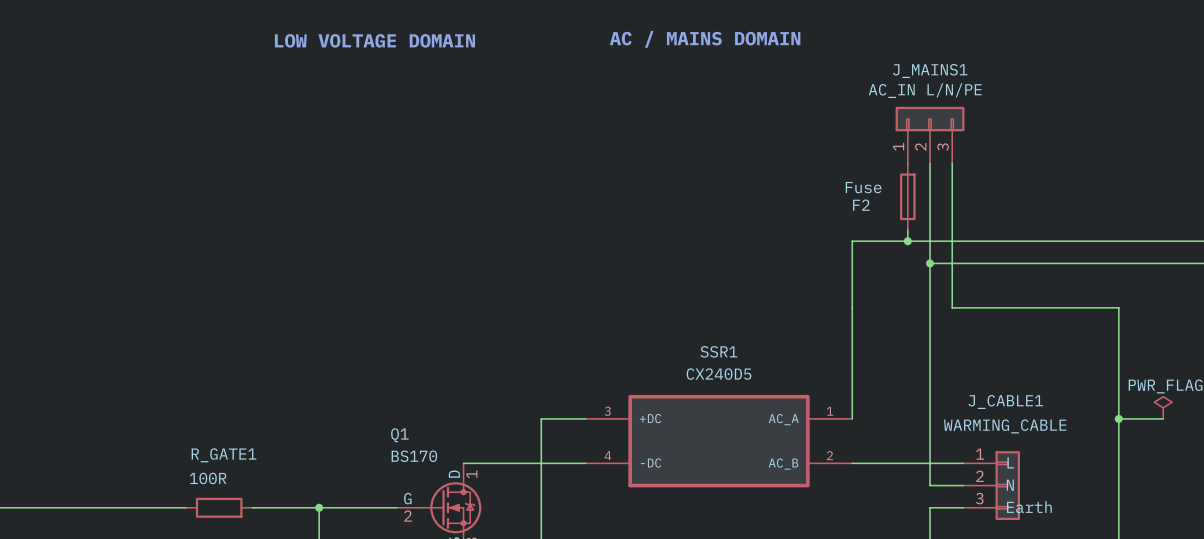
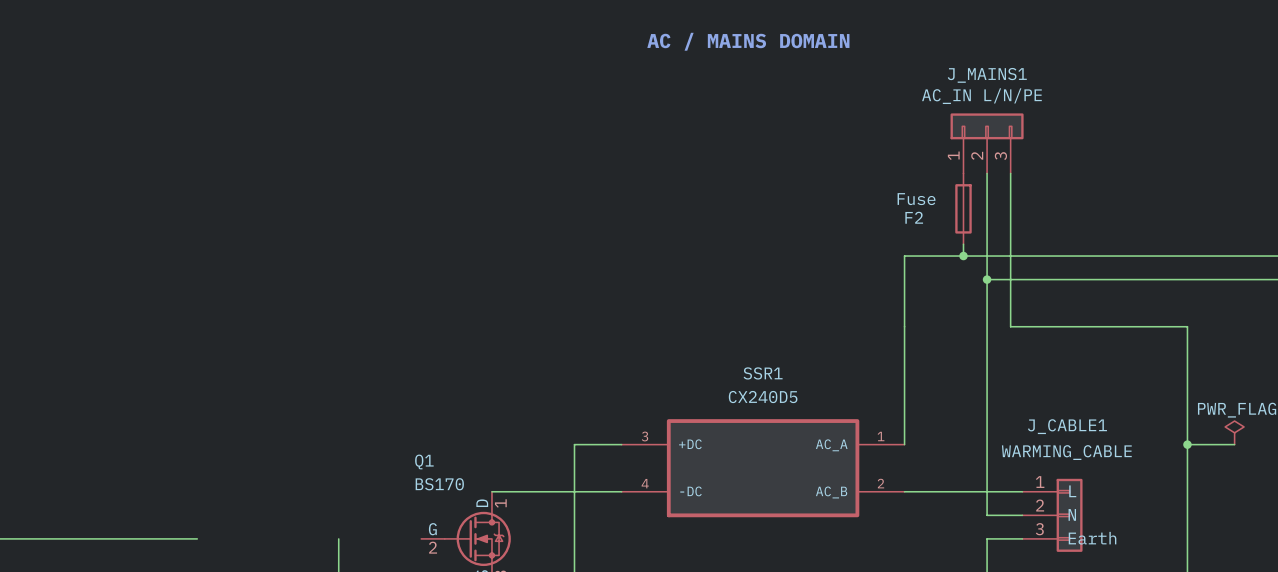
text: LOW VOLTAGE DOMAIN (374, 40) -> none
R_GATE1: 100R (219, 507) -> none
wire: (252, 507) (396, 507) -> none
junction: (319, 507) -> none

